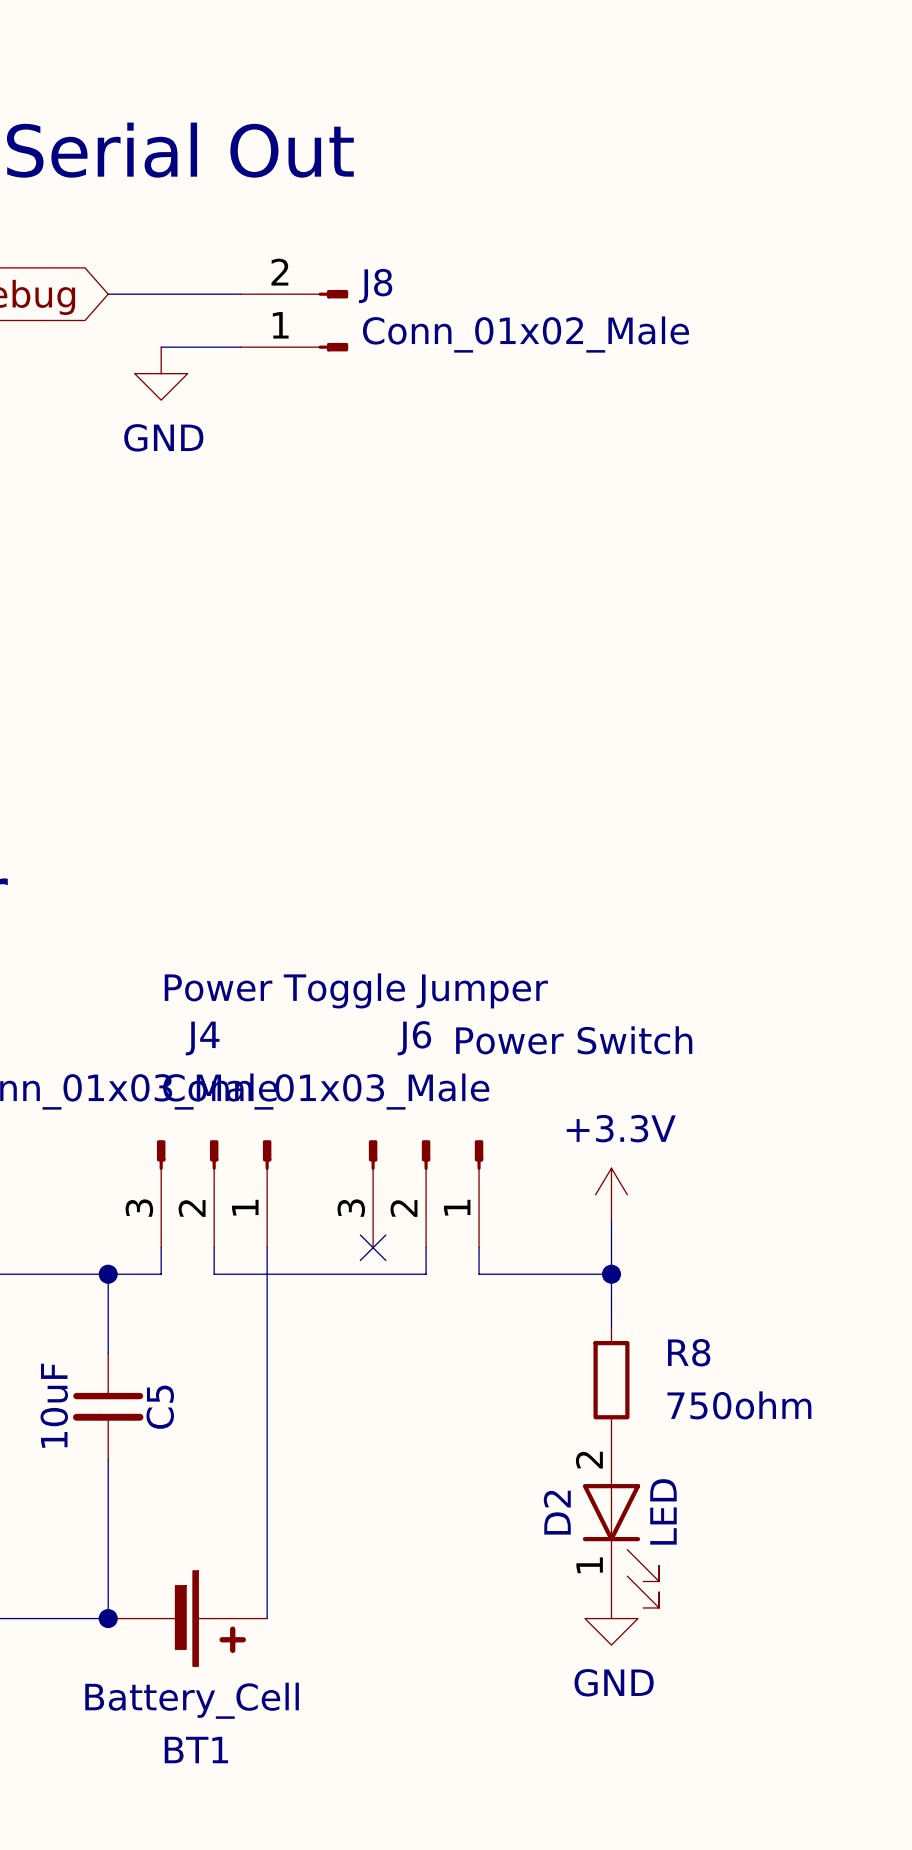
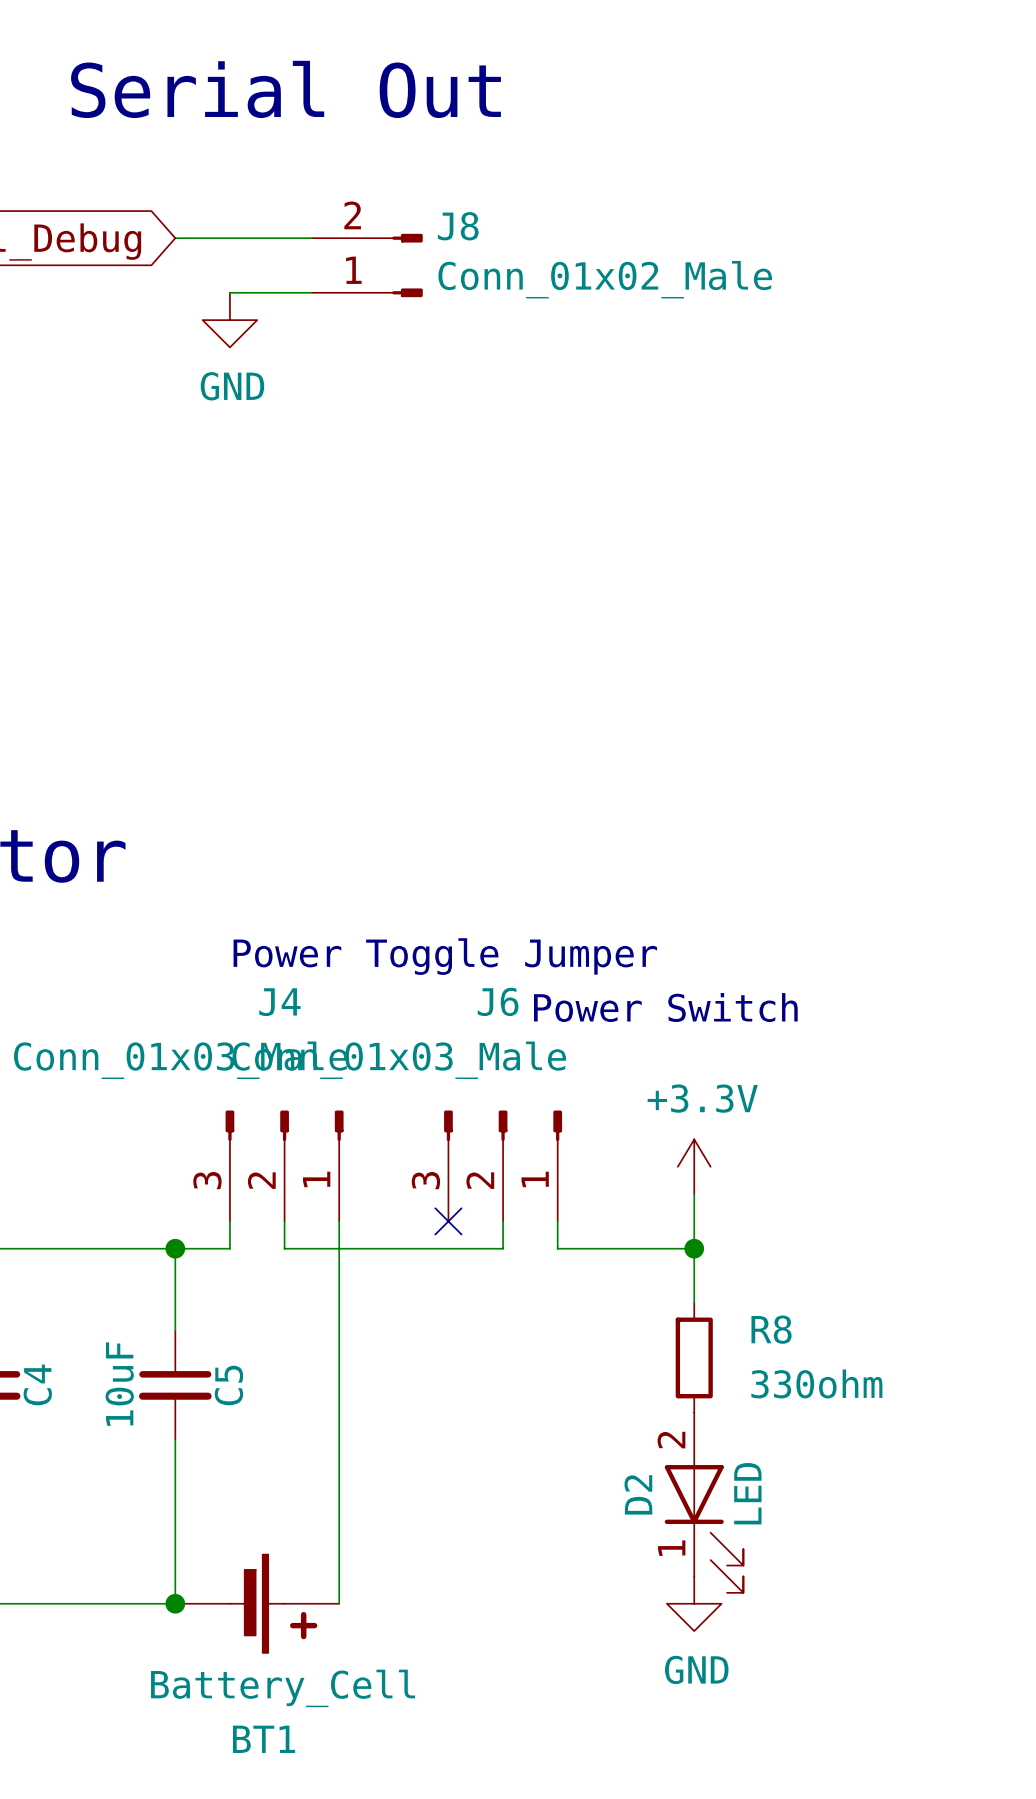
R8 value: 750ohm (739, 1405) -> 330ohm (816, 1383)

